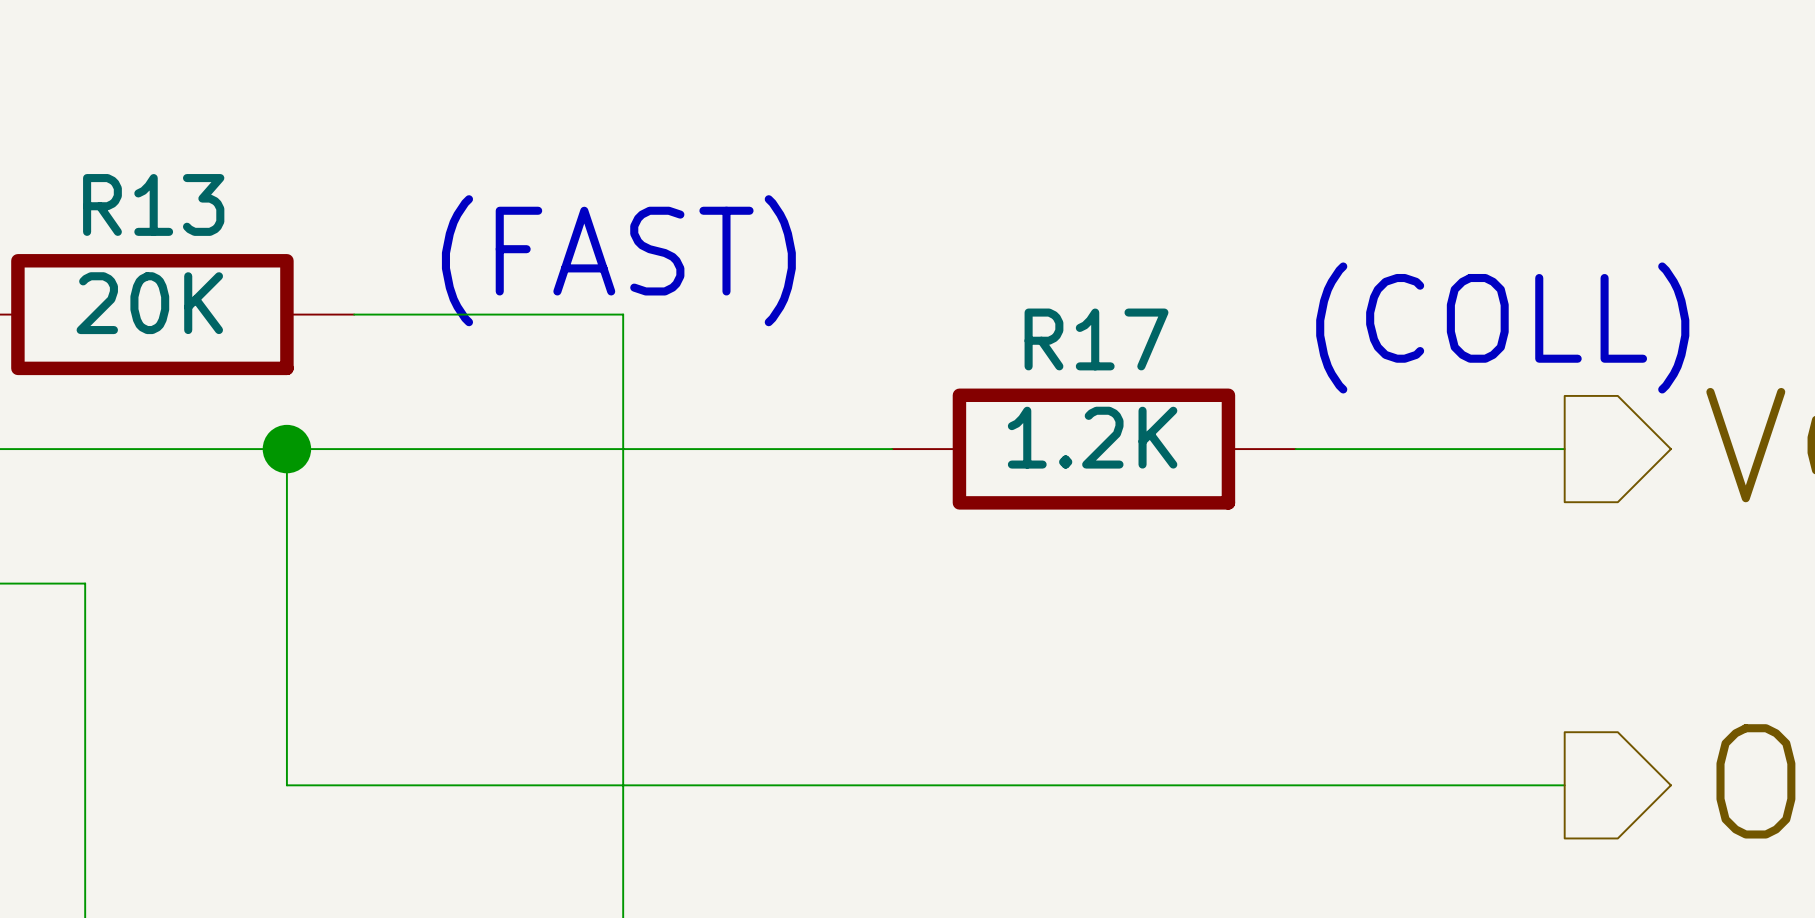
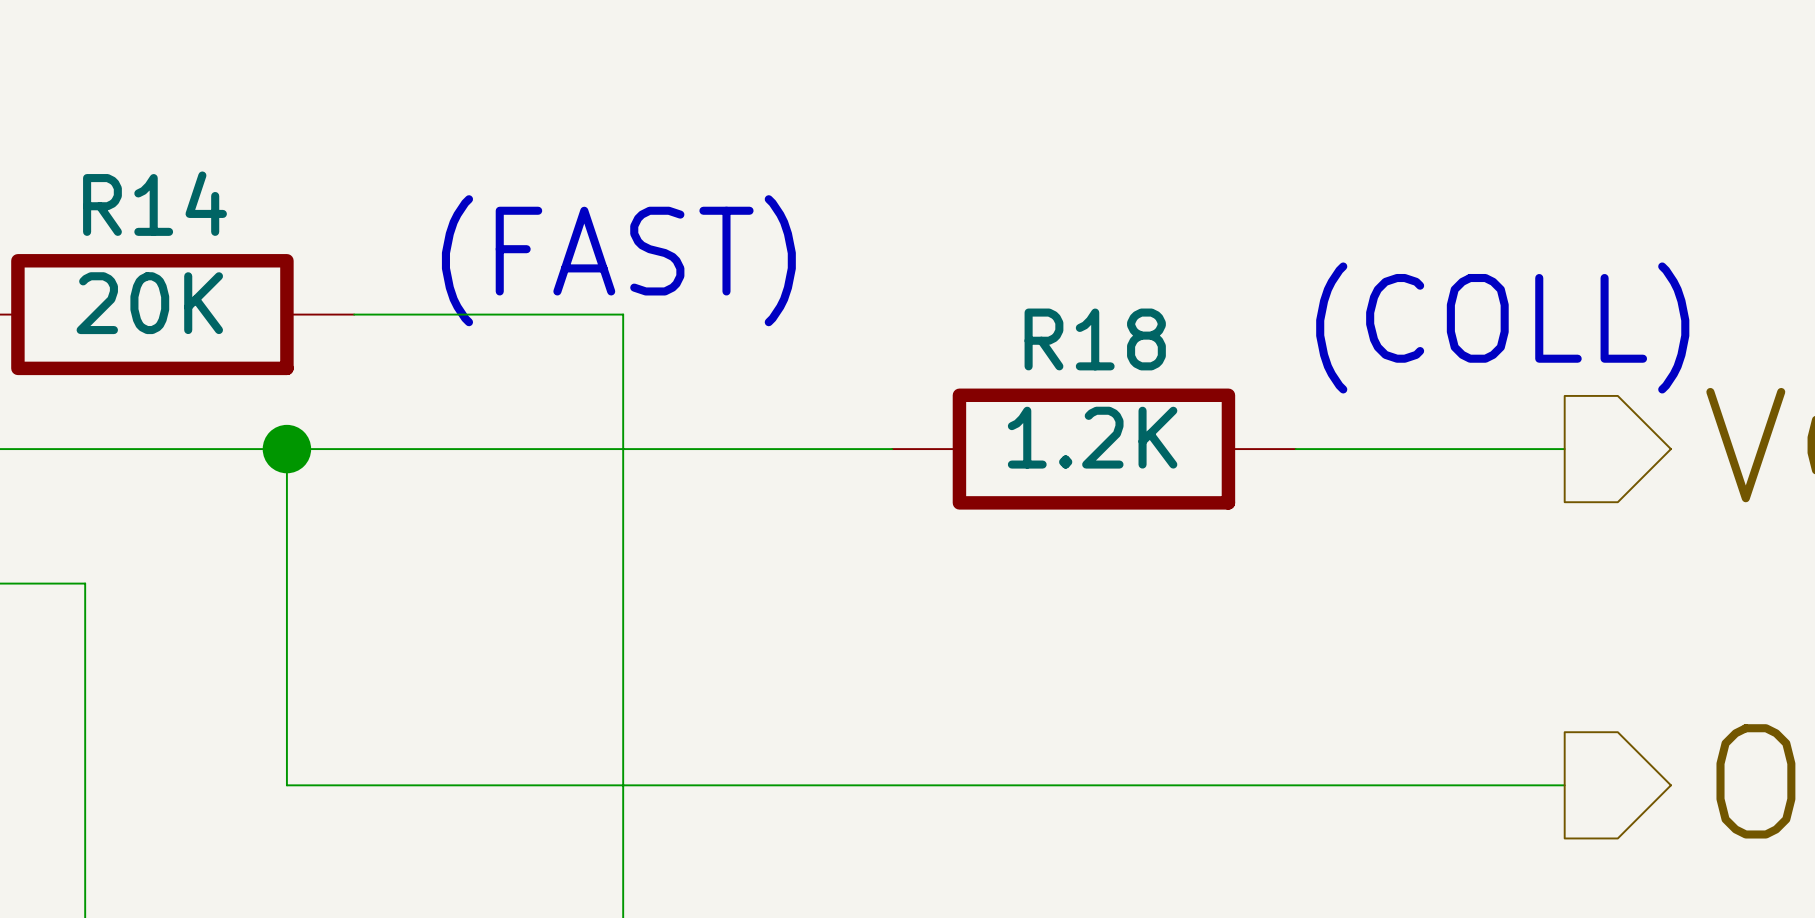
R13 name: R13 (153, 204) -> R14 (154, 203)
R17 name: R17 (1096, 339) -> R18 (1095, 339)

